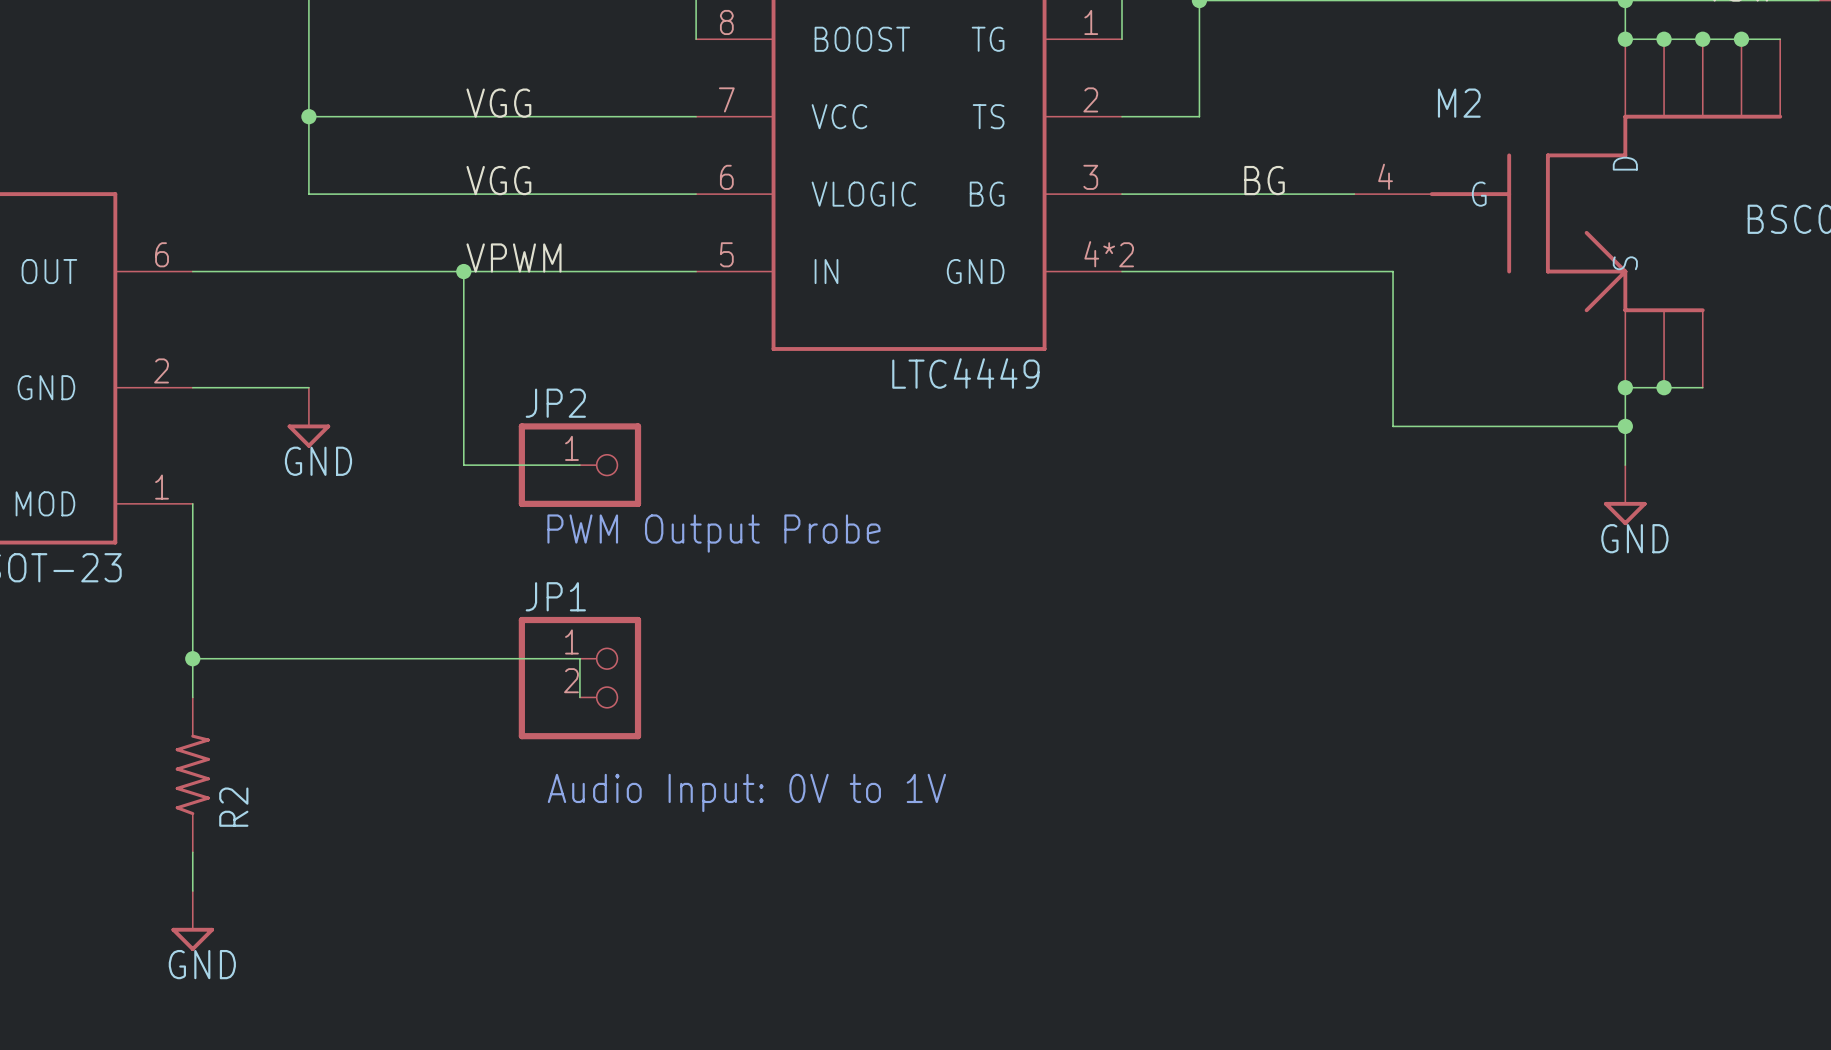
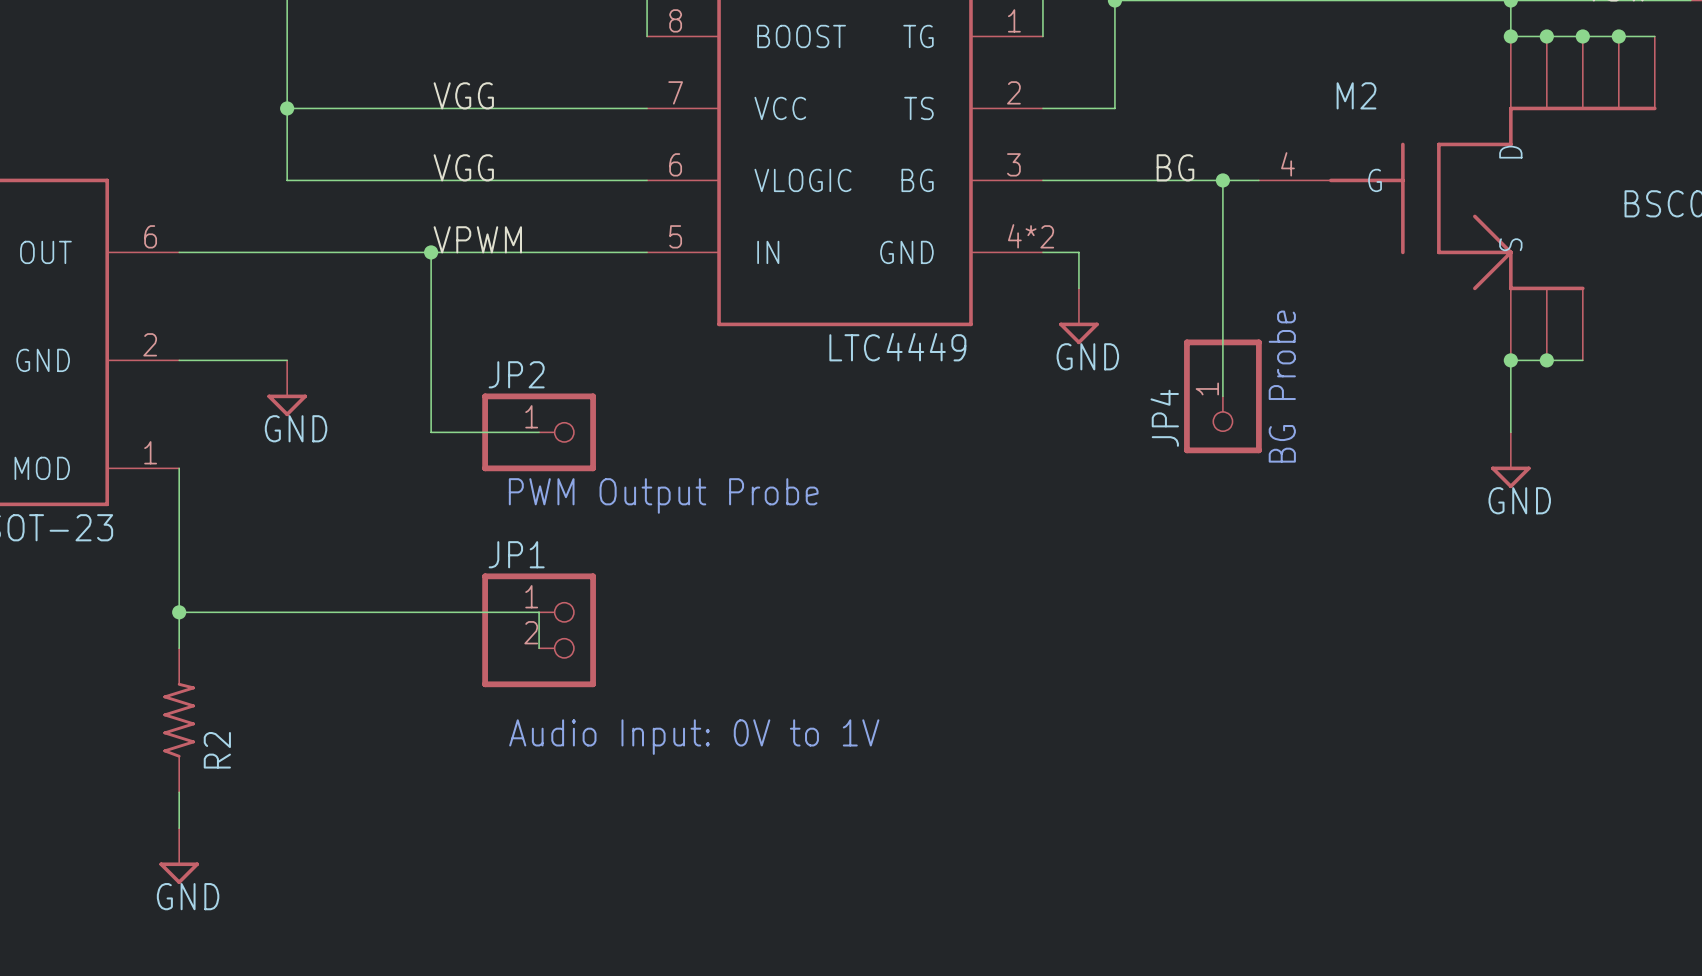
wire: none -> (1222, 180) (1222, 396)
junction: none -> (1222, 180)
wire: (1160, 271) (1393, 271) (1393, 426) (1625, 426) -> (1078, 252) (1078, 288)
power symbol: none -> GND (1078, 316)
text: none -> BG Probe (1282, 386)
JP4: none -> (1222, 396)
junction: (1625, 426) -> none

